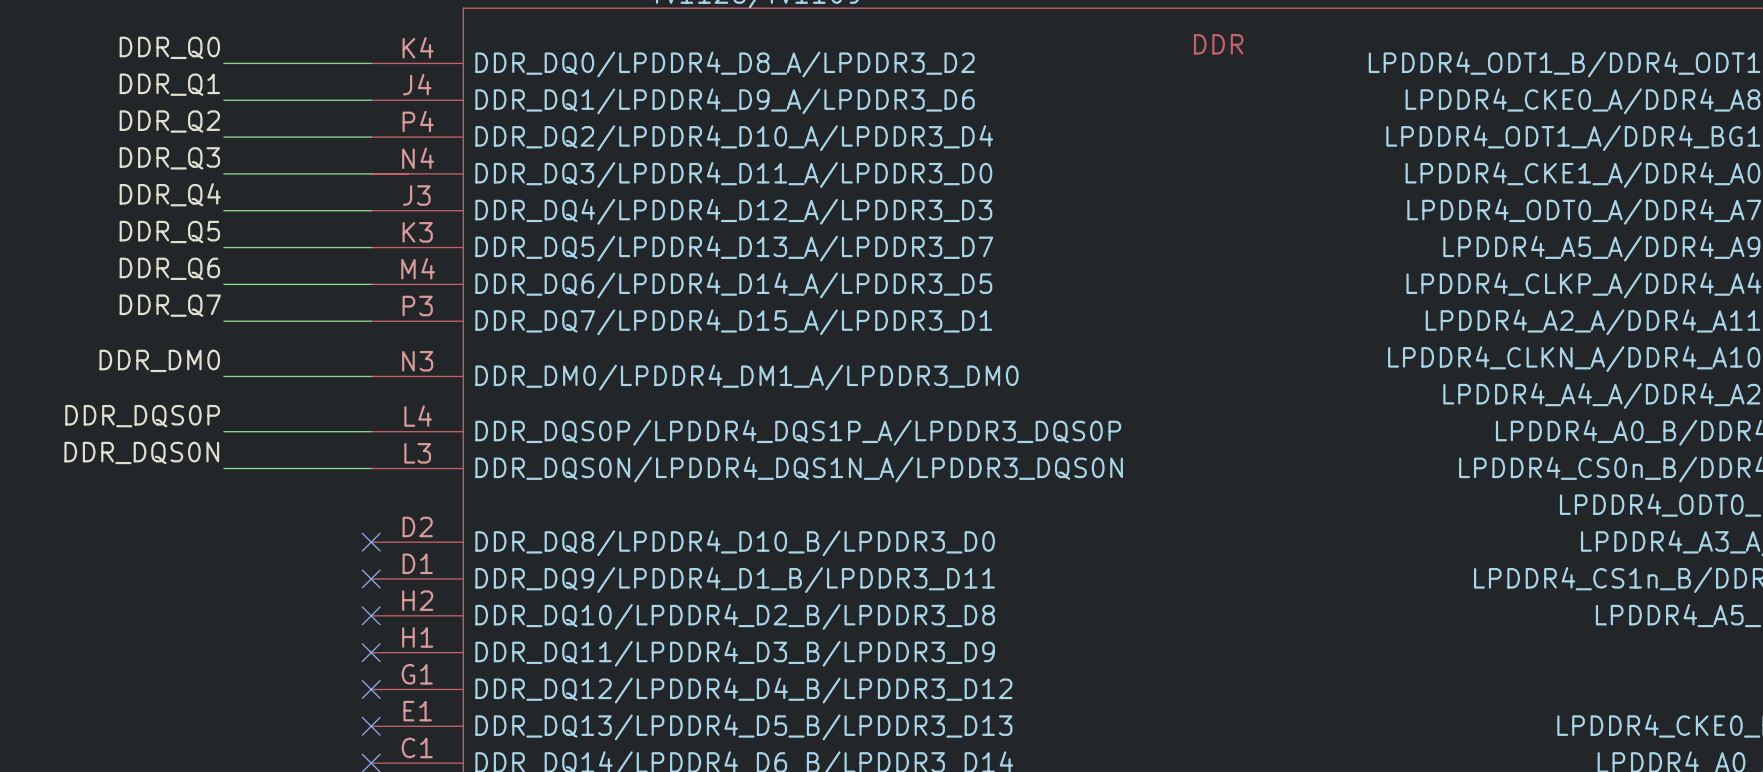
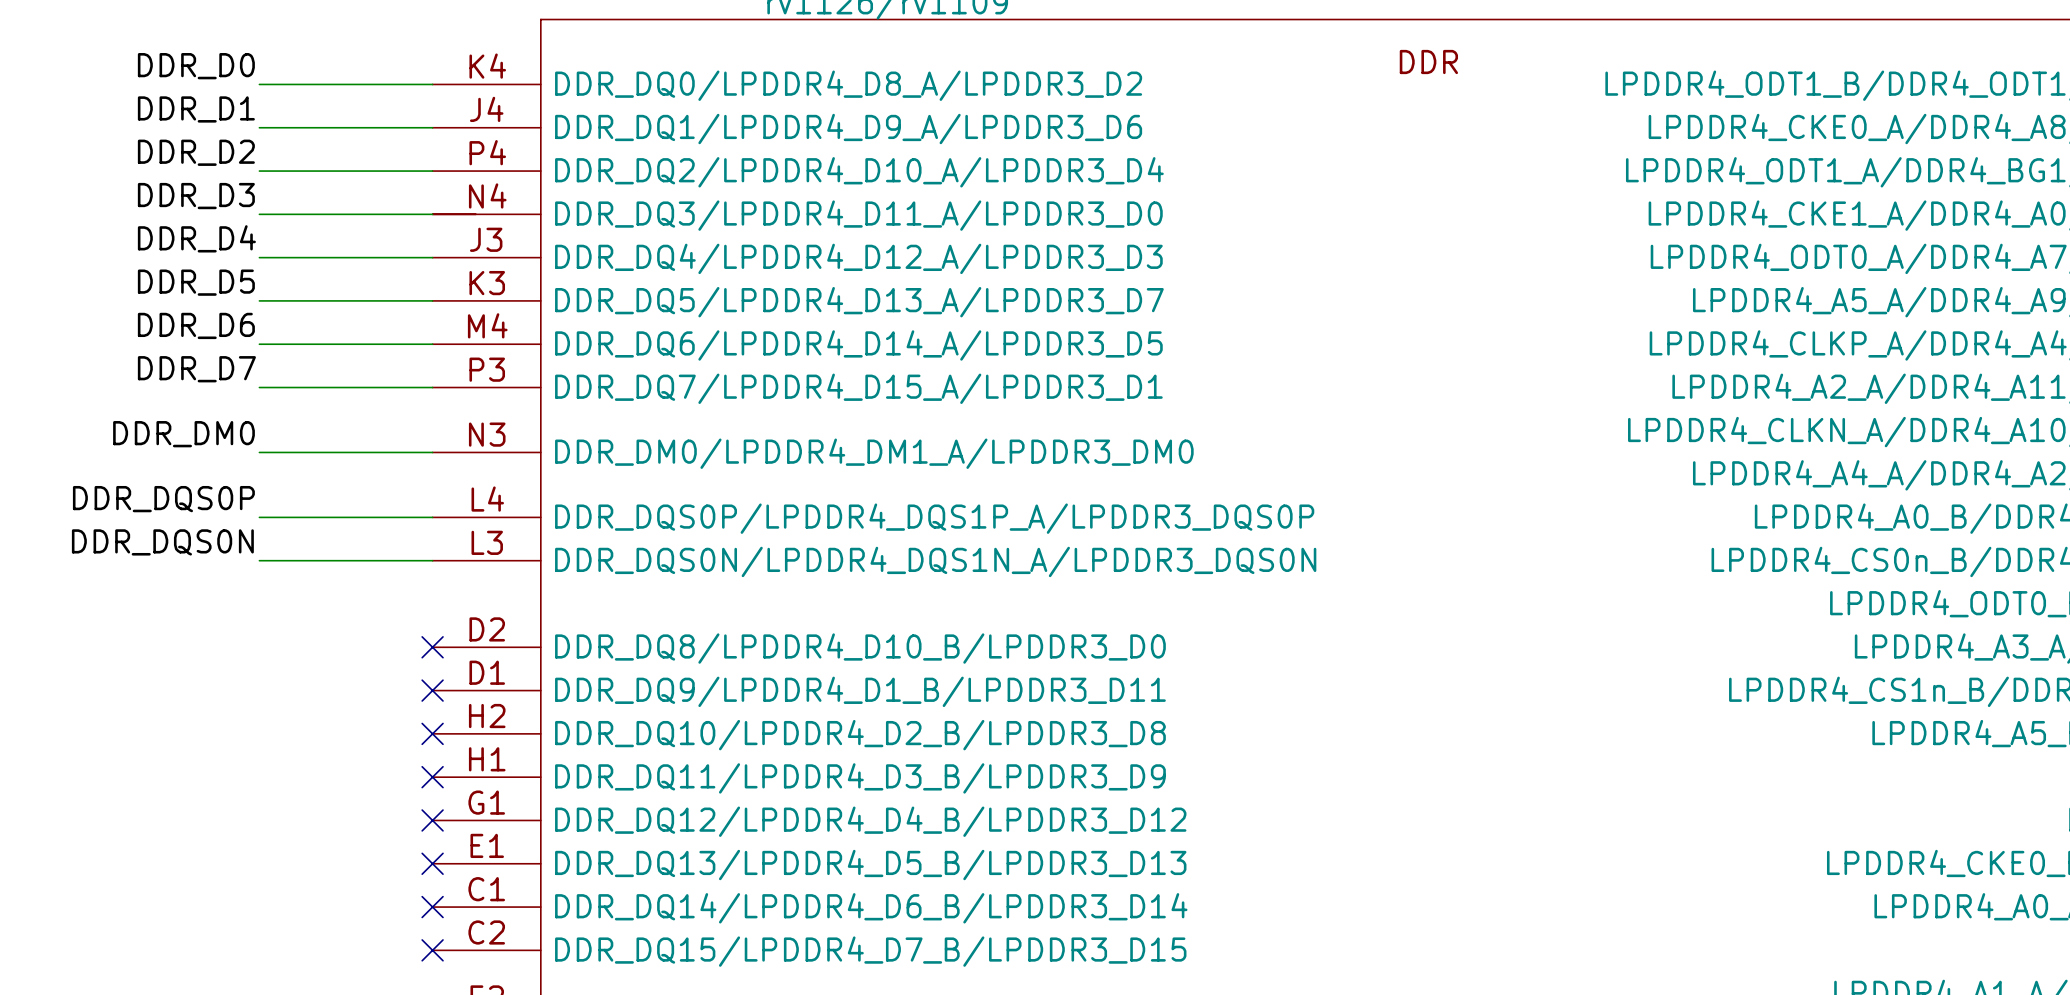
label: DDR_Q0 (169, 47) -> DDR_D0 (196, 66)
label: DDR_Q1 (169, 84) -> DDR_D1 (196, 109)
label: DDR_Q2 (169, 121) -> DDR_D2 (196, 152)
label: DDR_Q3 (169, 158) -> DDR_D3 (196, 196)
label: DDR_Q4 (170, 194) -> DDR_D4 (196, 238)
label: DDR_Q5 (169, 232) -> DDR_D5 (196, 282)
label: DDR_Q6 (169, 268) -> DDR_D6 (196, 325)
label: DDR_Q7 (170, 305) -> DDR_D7 (196, 369)

